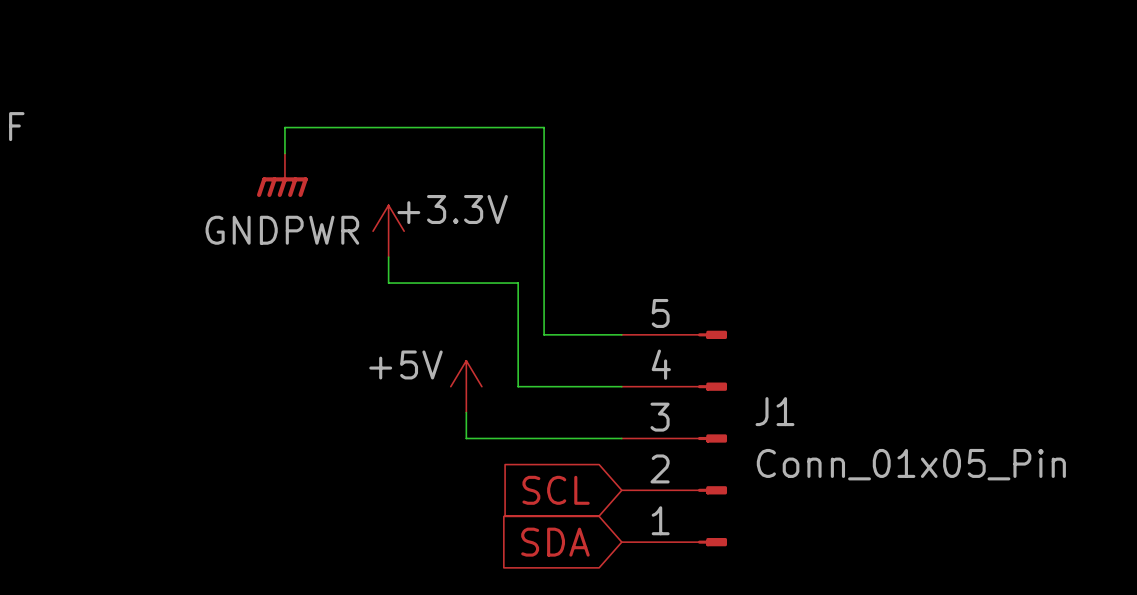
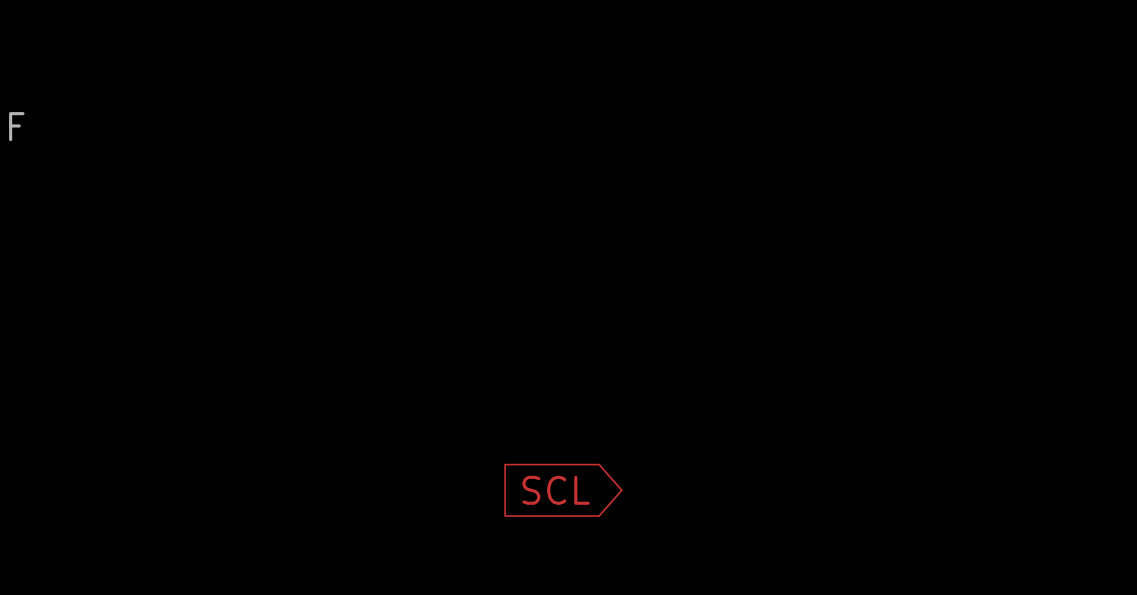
wire: (284, 153) (284, 127) (544, 127) (544, 334) (621, 334) -> none
power symbol: GNDPWR (282, 175) -> none
power symbol: +3.3V (388, 231) -> none
wire: (388, 257) (388, 283) (518, 283) (518, 386) (621, 386) -> none
power symbol: +5V (466, 386) -> none
wire: (466, 412) (466, 438) (621, 438) -> none
J1: Conn_01x05_Pin (674, 438) -> none
global label: SDA (555, 542) -> none

